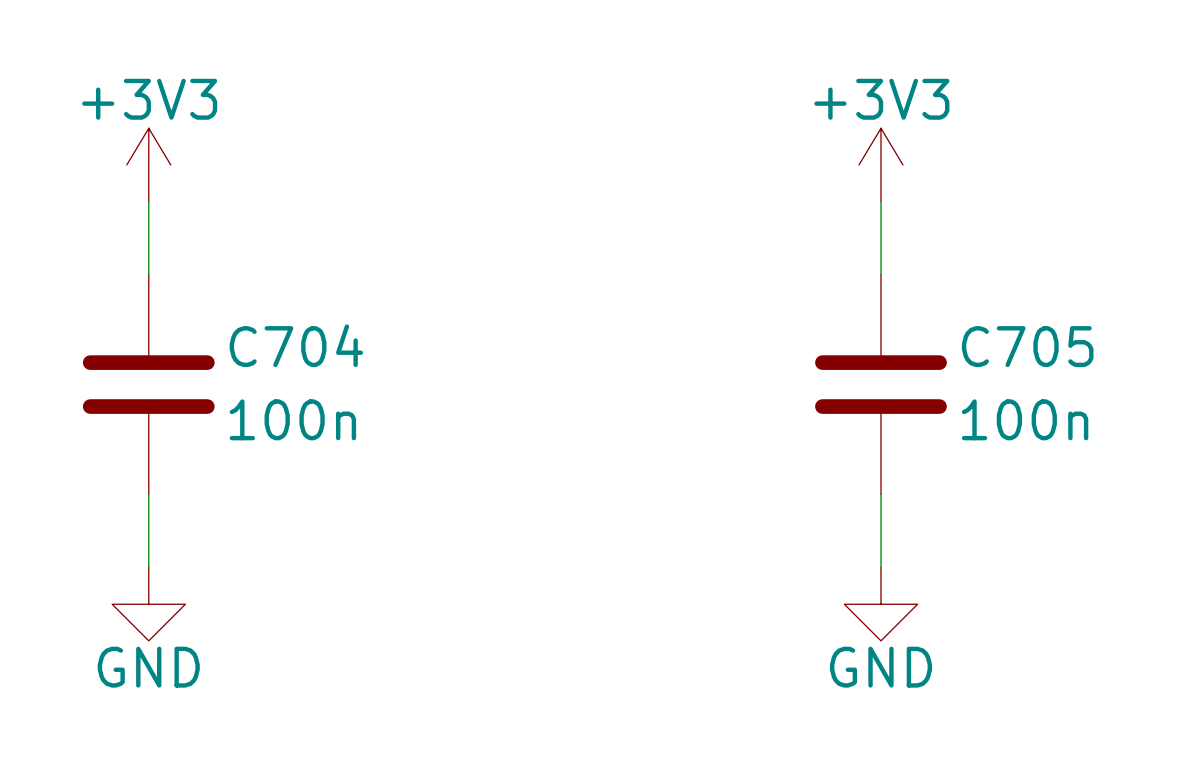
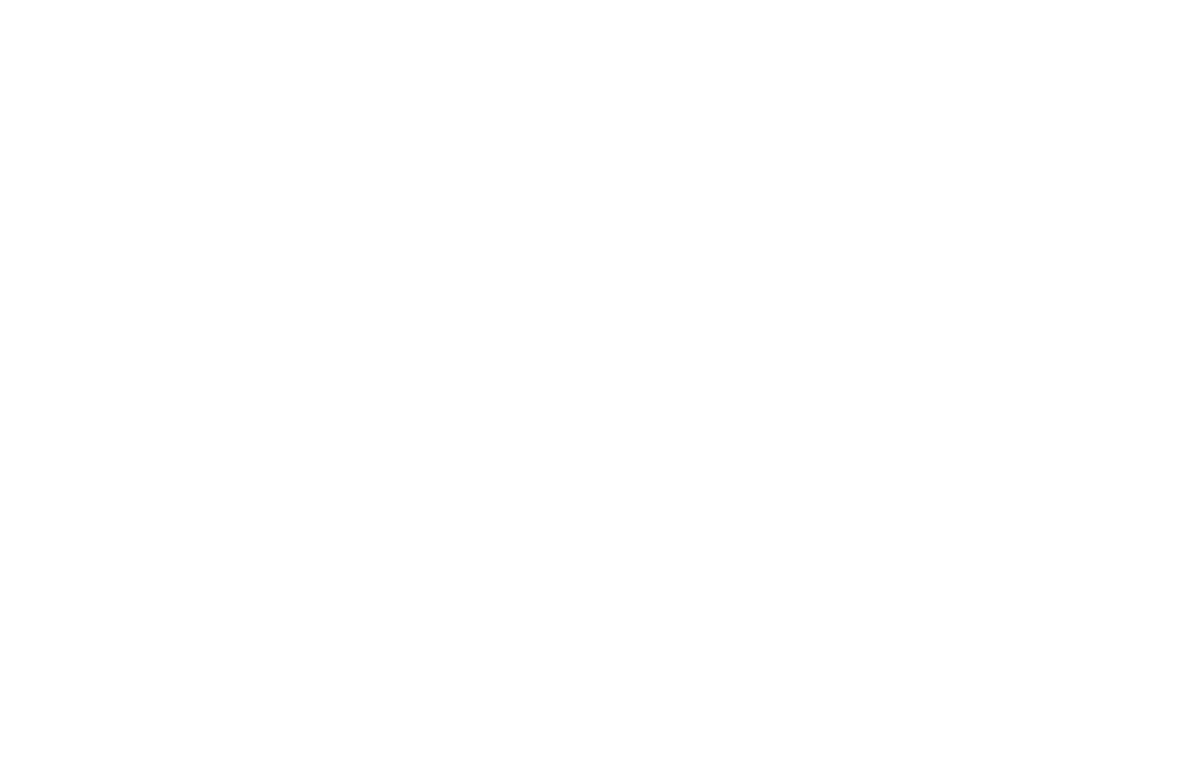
power symbol: +3V3 (148, 164) -> none
power symbol: +3V3 (880, 164) -> none
wire: (148, 201) (148, 274) -> none
wire: (880, 201) (880, 274) -> none
C704: 100n (148, 384) -> none
C705: 100n (880, 384) -> none
wire: (148, 494) (148, 567) -> none
wire: (880, 494) (880, 567) -> none
power symbol: GND (148, 604) -> none
power symbol: GND (880, 604) -> none

